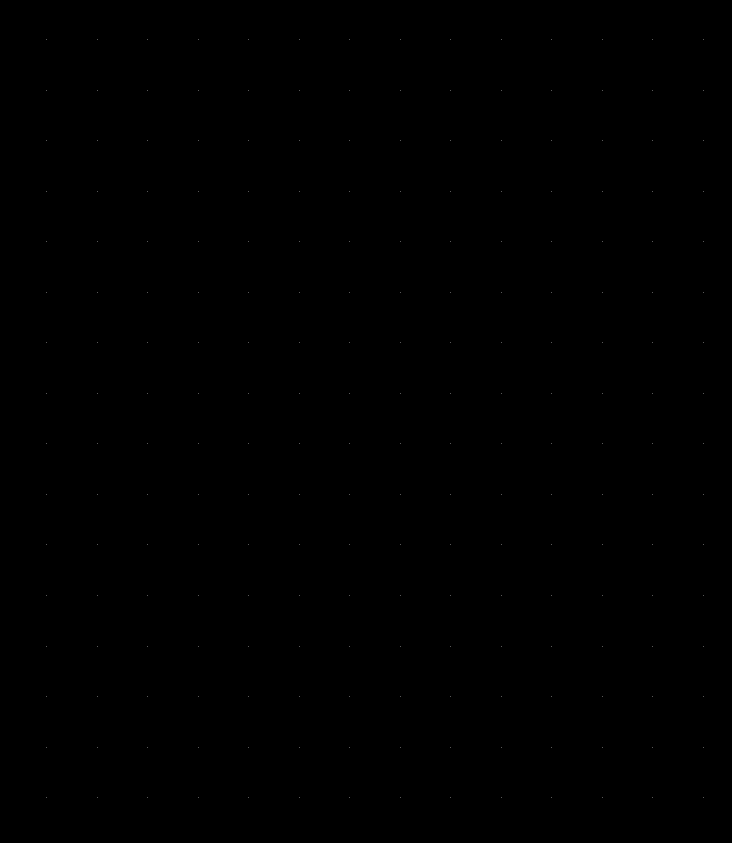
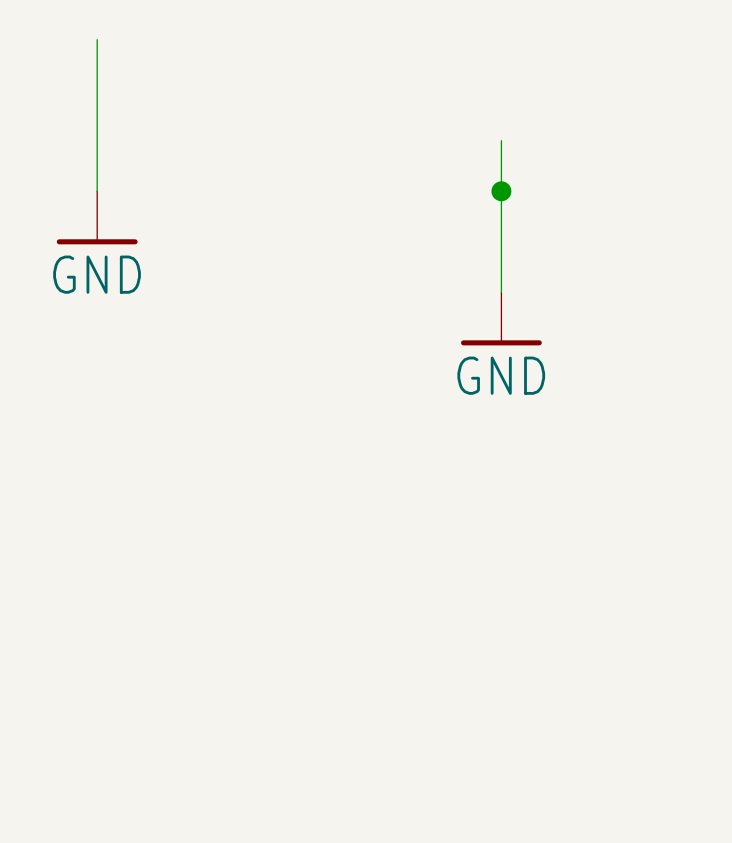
wire: none -> (97, 39) (97, 191)
wire: none -> (501, 140) (501, 292)
junction: none -> (501, 191)
power symbol: none -> GND (97, 217)
power symbol: none -> GND (501, 318)

